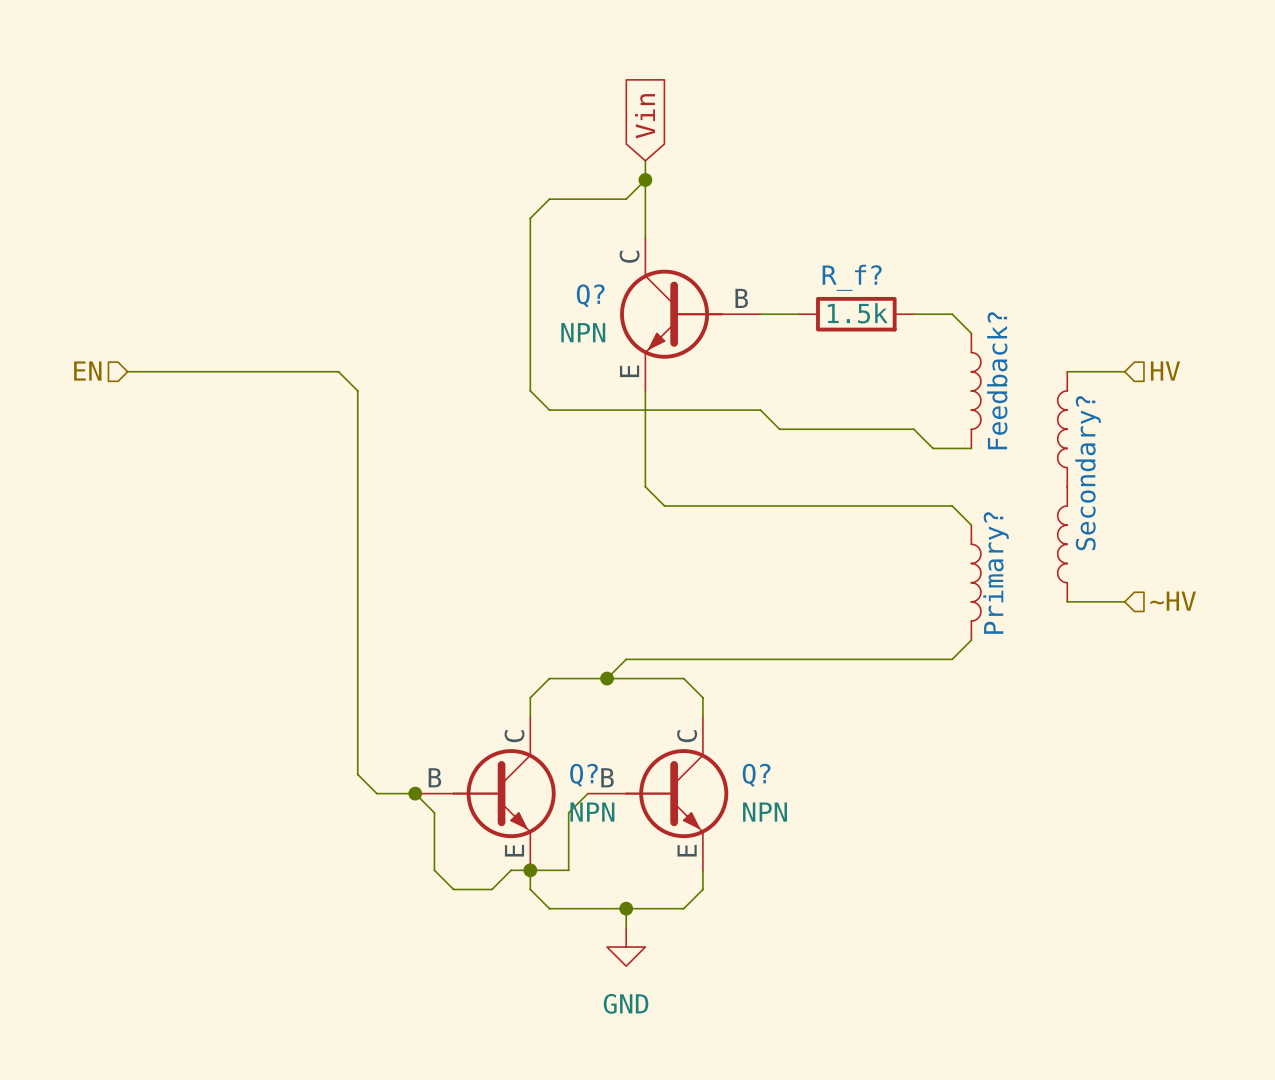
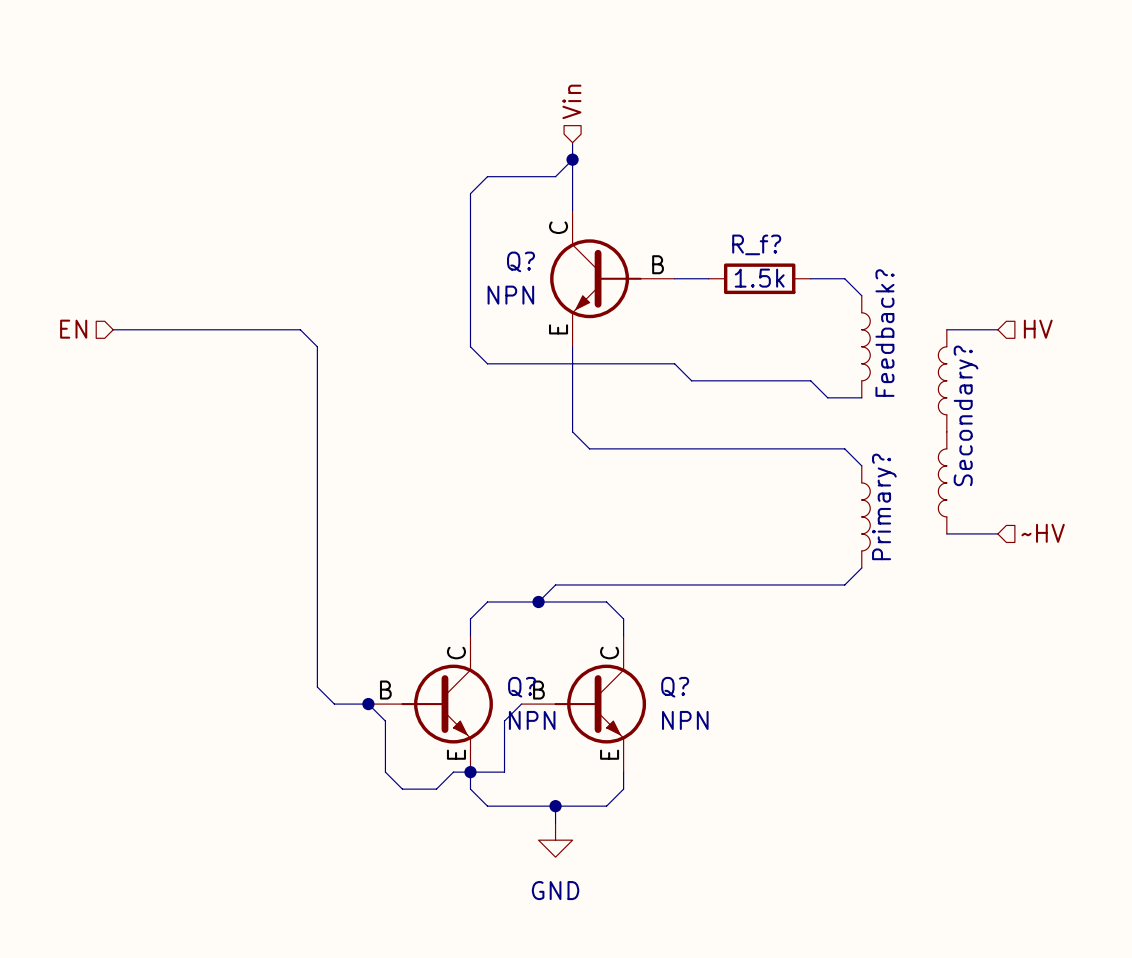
hierarchical label: none -> Vin (571, 101)
global label: Vin (644, 116) -> none

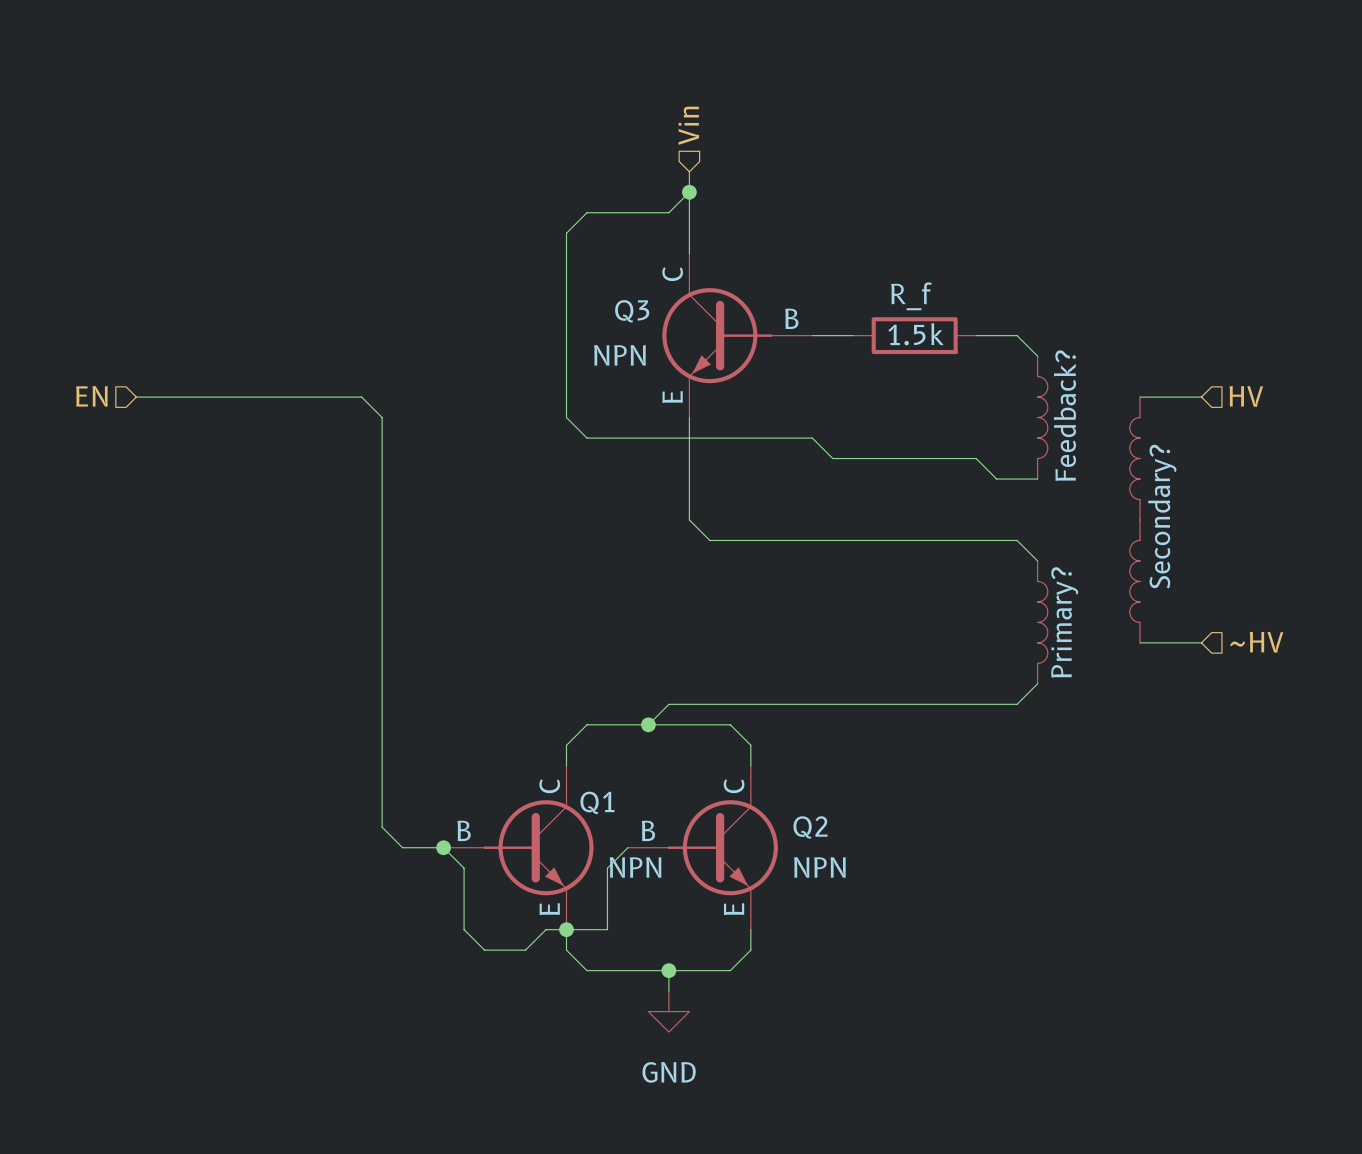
R_f? name: R_f? (756, 244) -> R_f (911, 296)
Q? name: Q? (520, 261) -> Q3 (632, 311)
Q? name: Q? (522, 687) -> Q1 (597, 802)
Q? name: Q? (675, 687) -> Q2 (810, 827)

